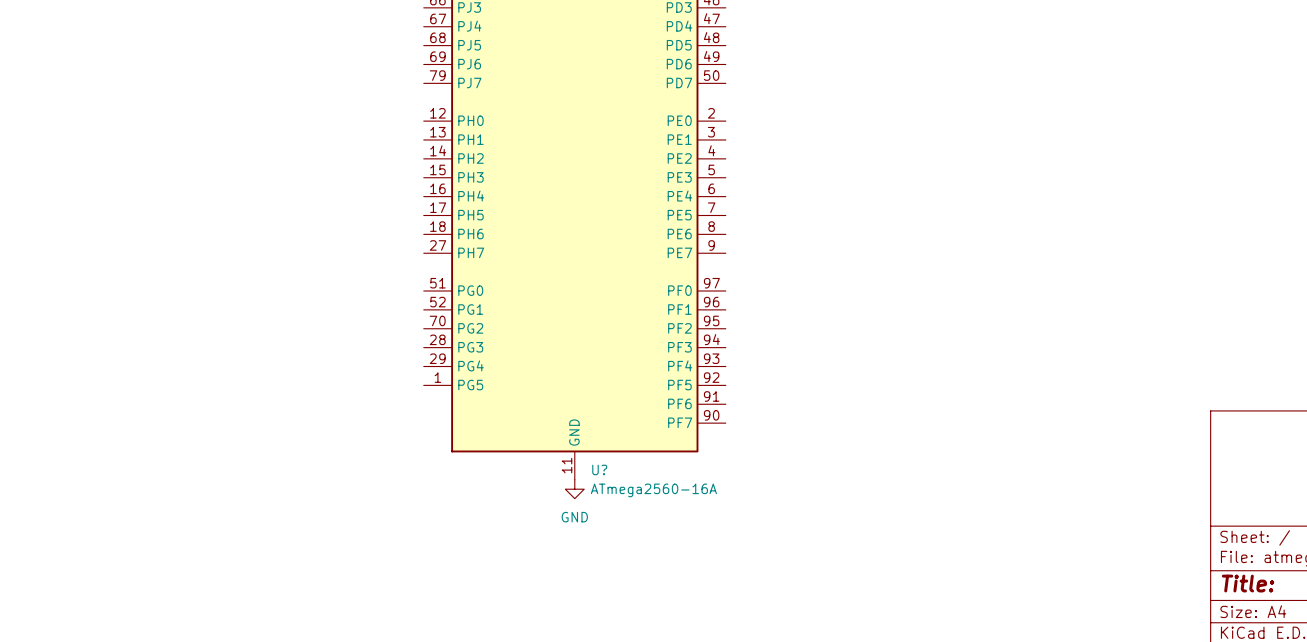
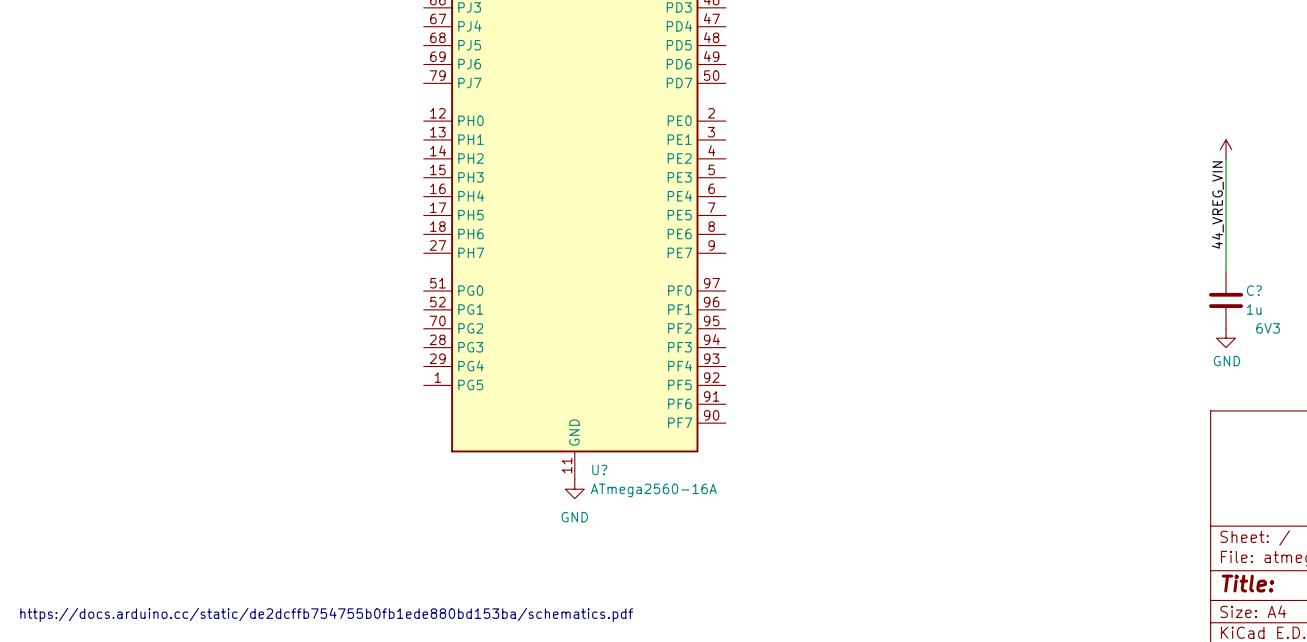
power symbol: none -> (1226, 149)
wire: none -> (1226, 158) (1226, 272)
label: none -> 44_VREG_VIN (1217, 205)
C?: none -> 1u (1226, 300)
power symbol: none -> GND (1226, 338)
text: none -> https://docs.arduino.cc/static/de2dcffb754755b0fb1ede880bd153ba/schematics.pdf (326, 614)

